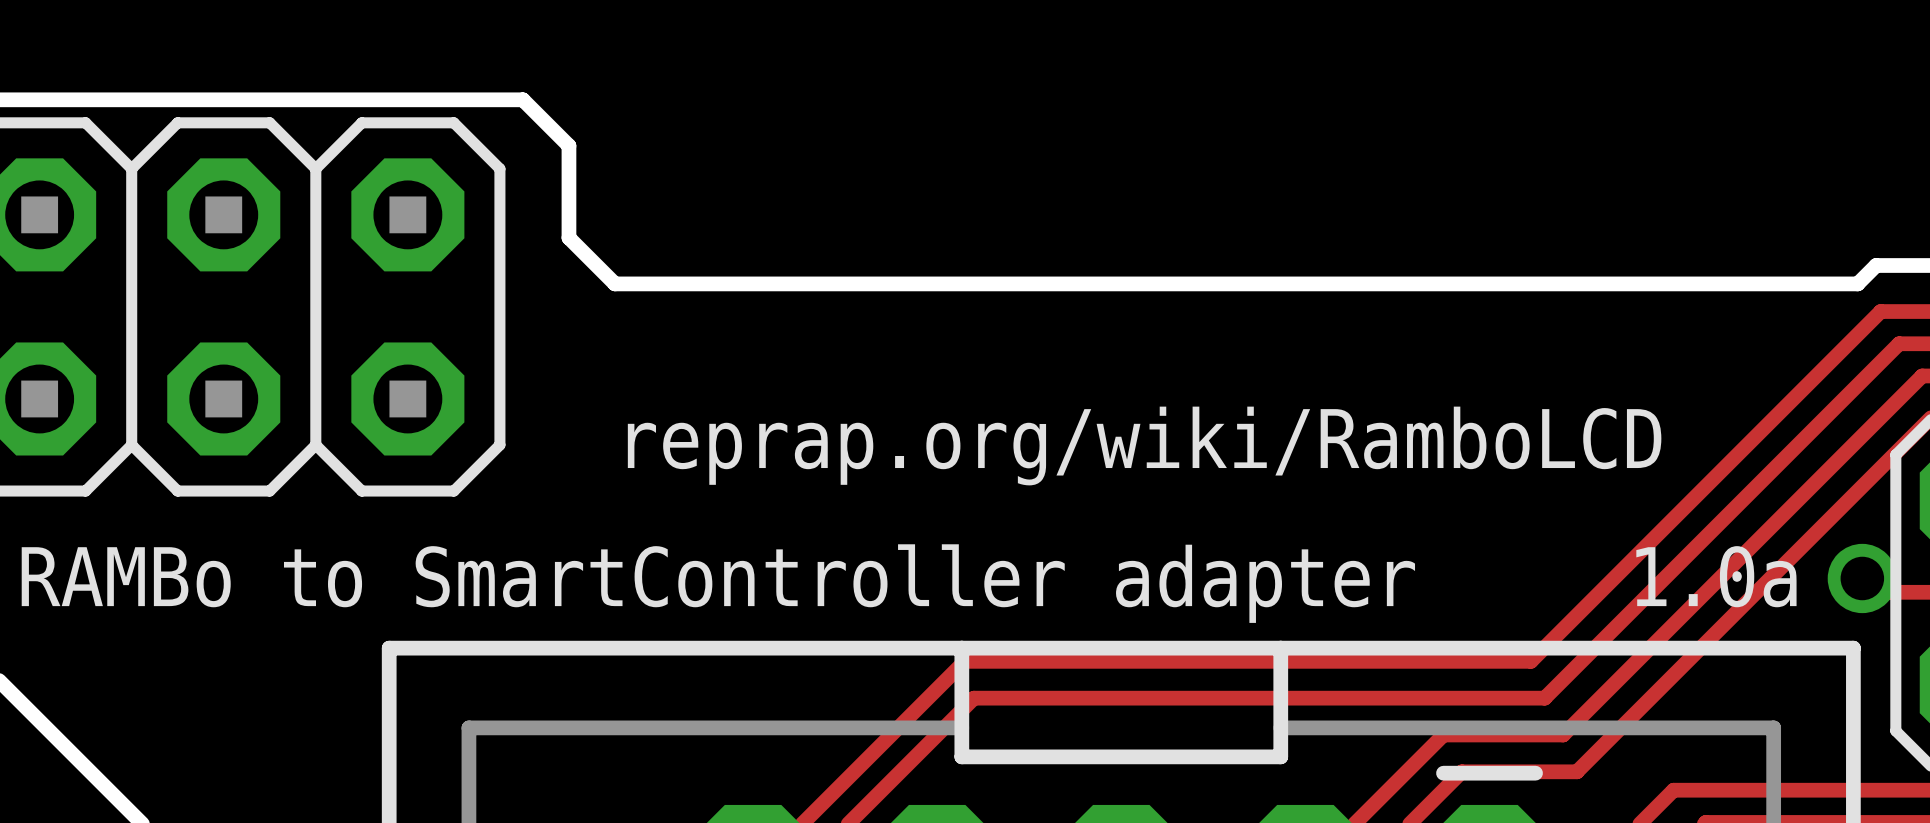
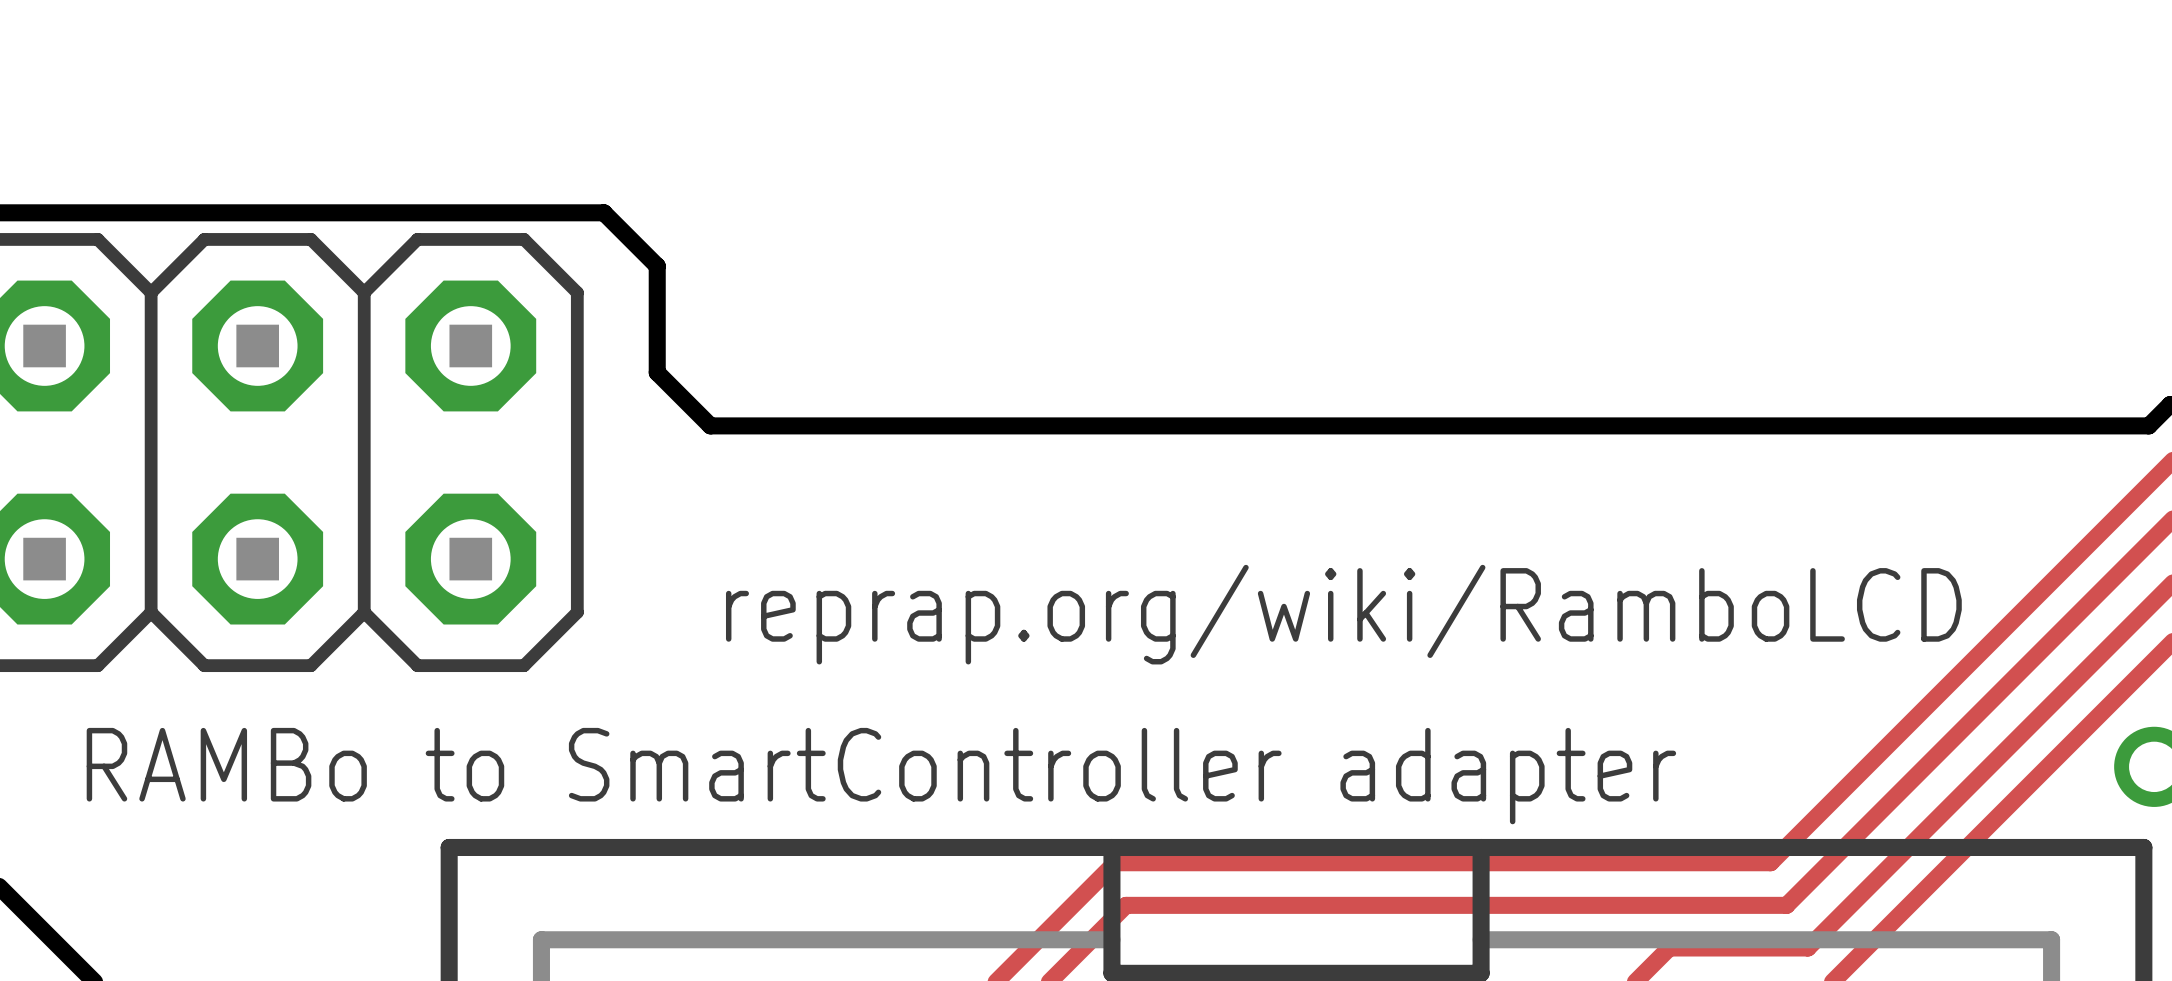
text: 1.0a (1716, 576) -> none
text position: RAMBo to SmartController adapter (718, 583) -> RAMBo to SmartController adapter (881, 776)

